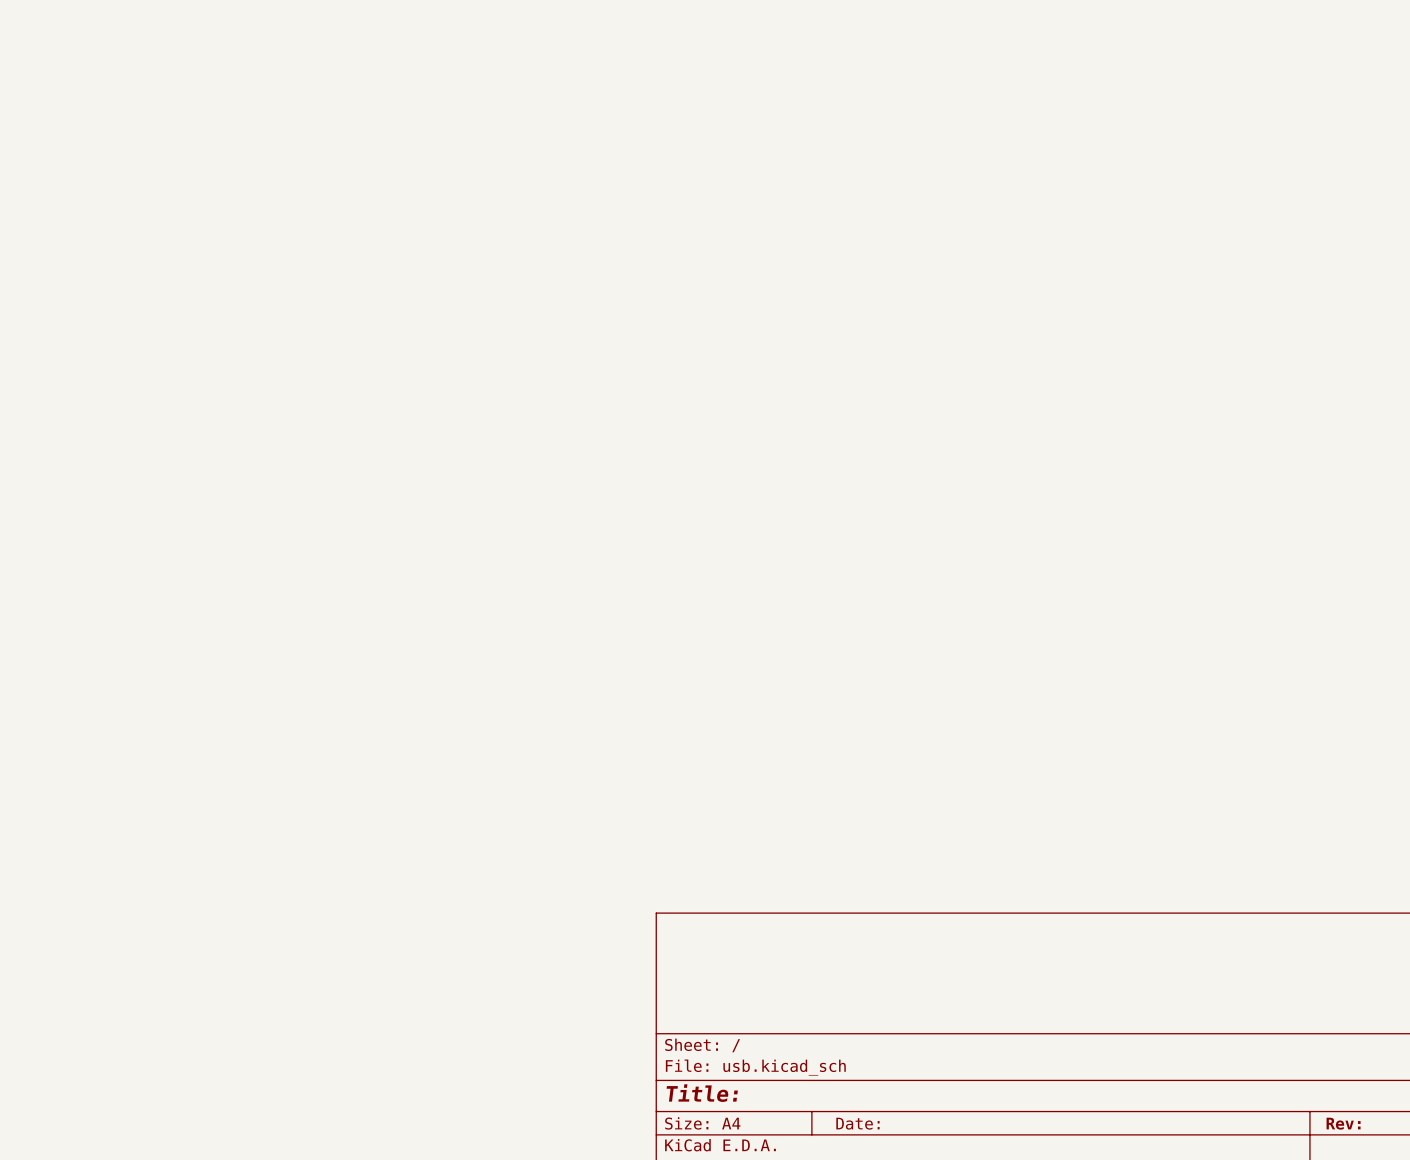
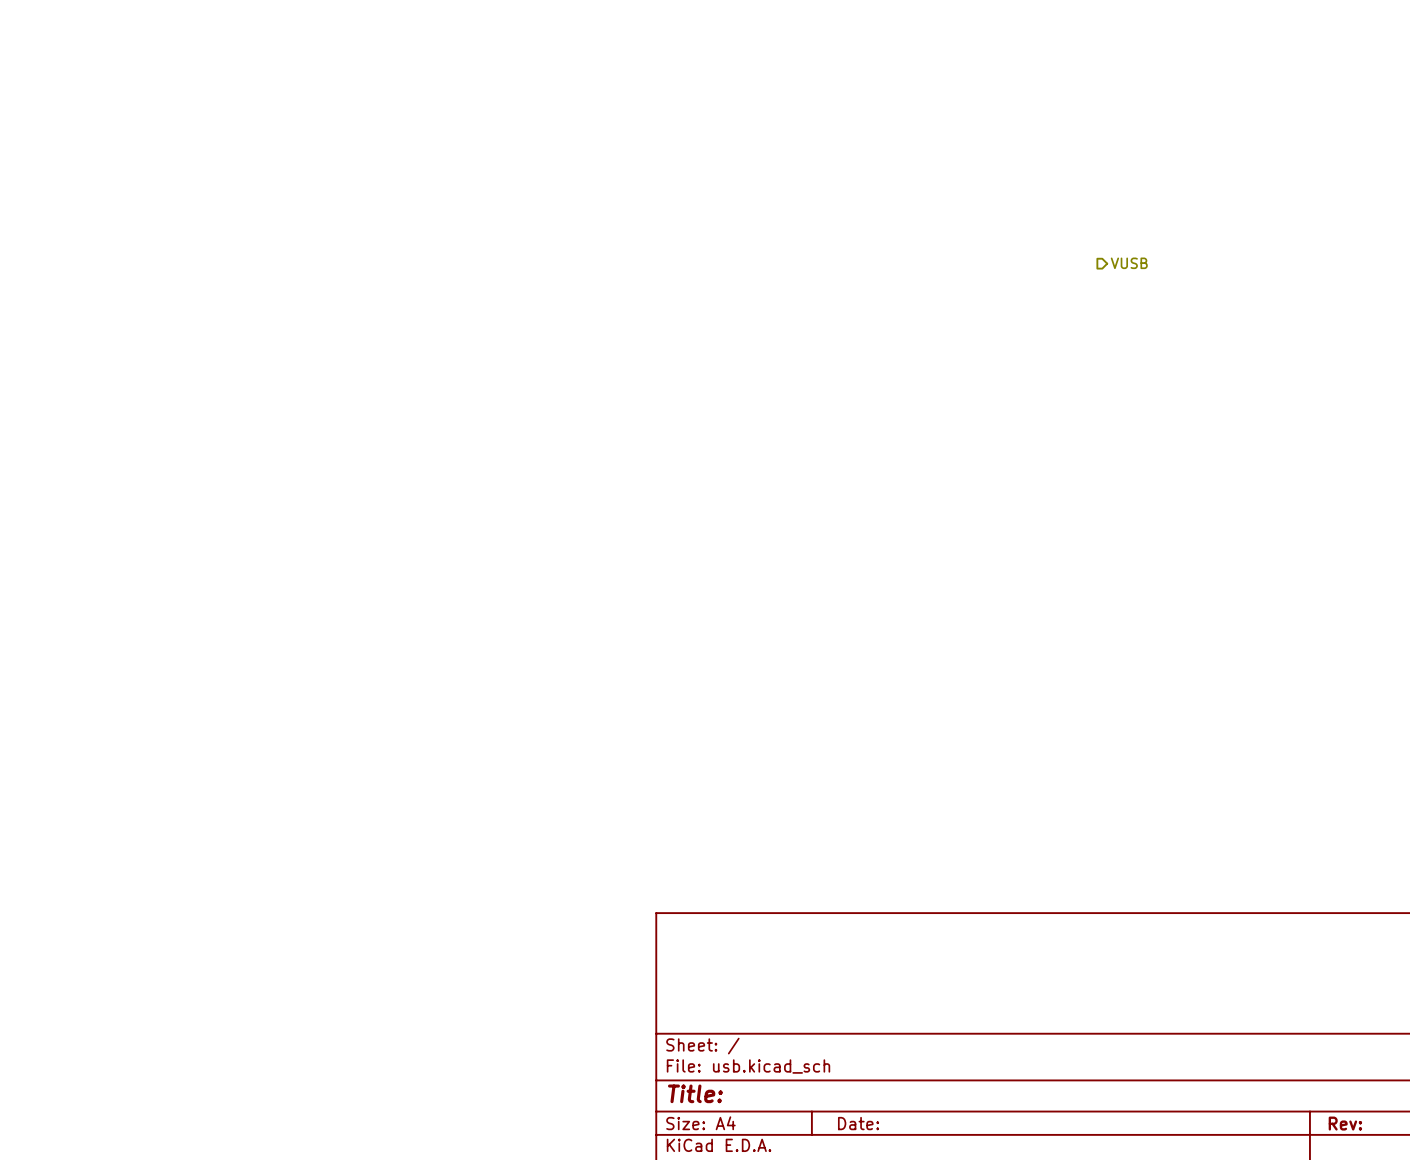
hierarchical label: none -> VUSB (1129, 263)

